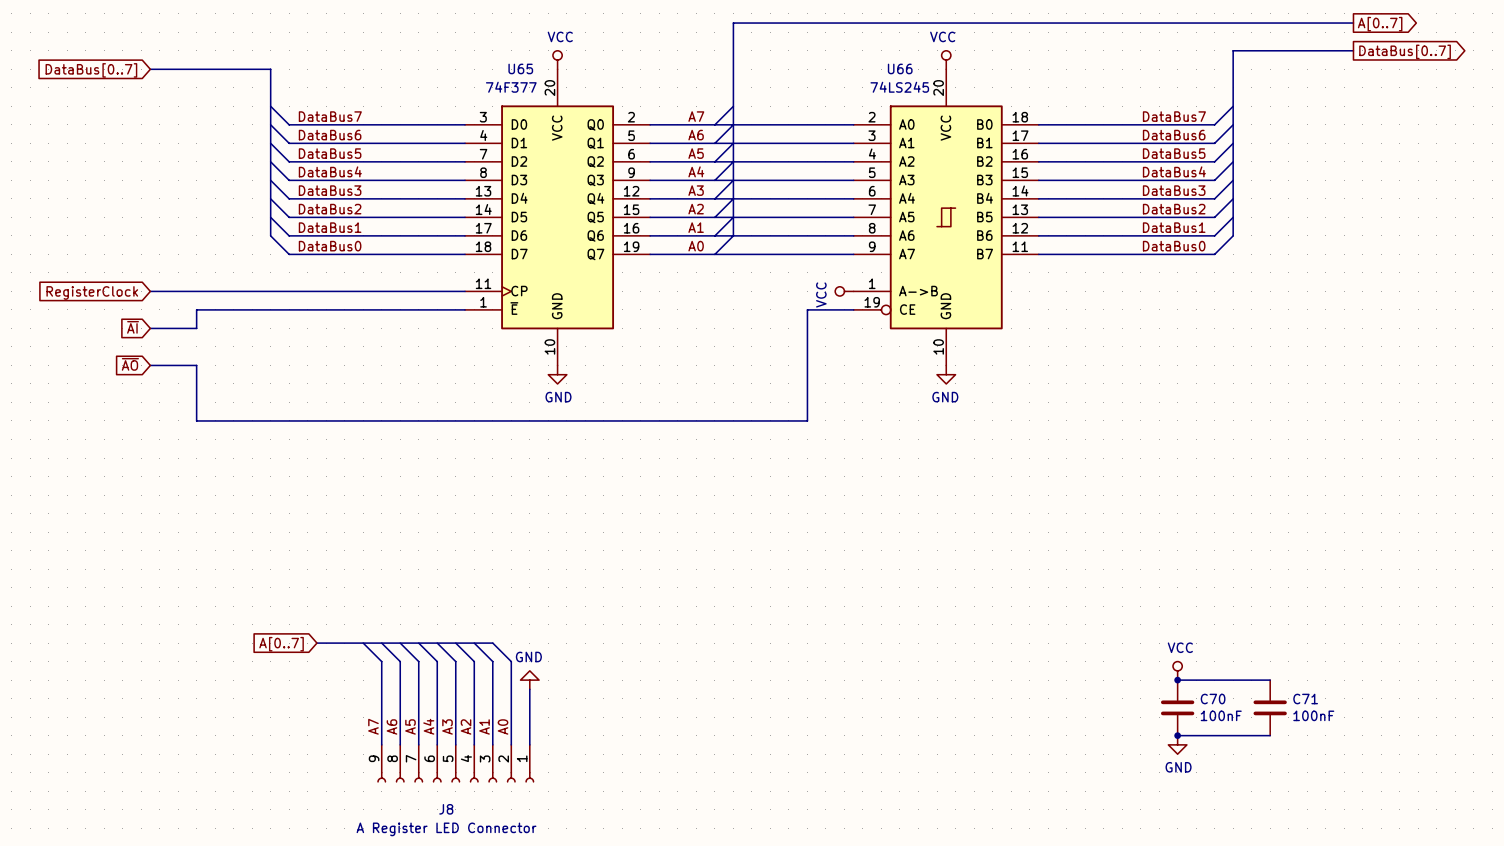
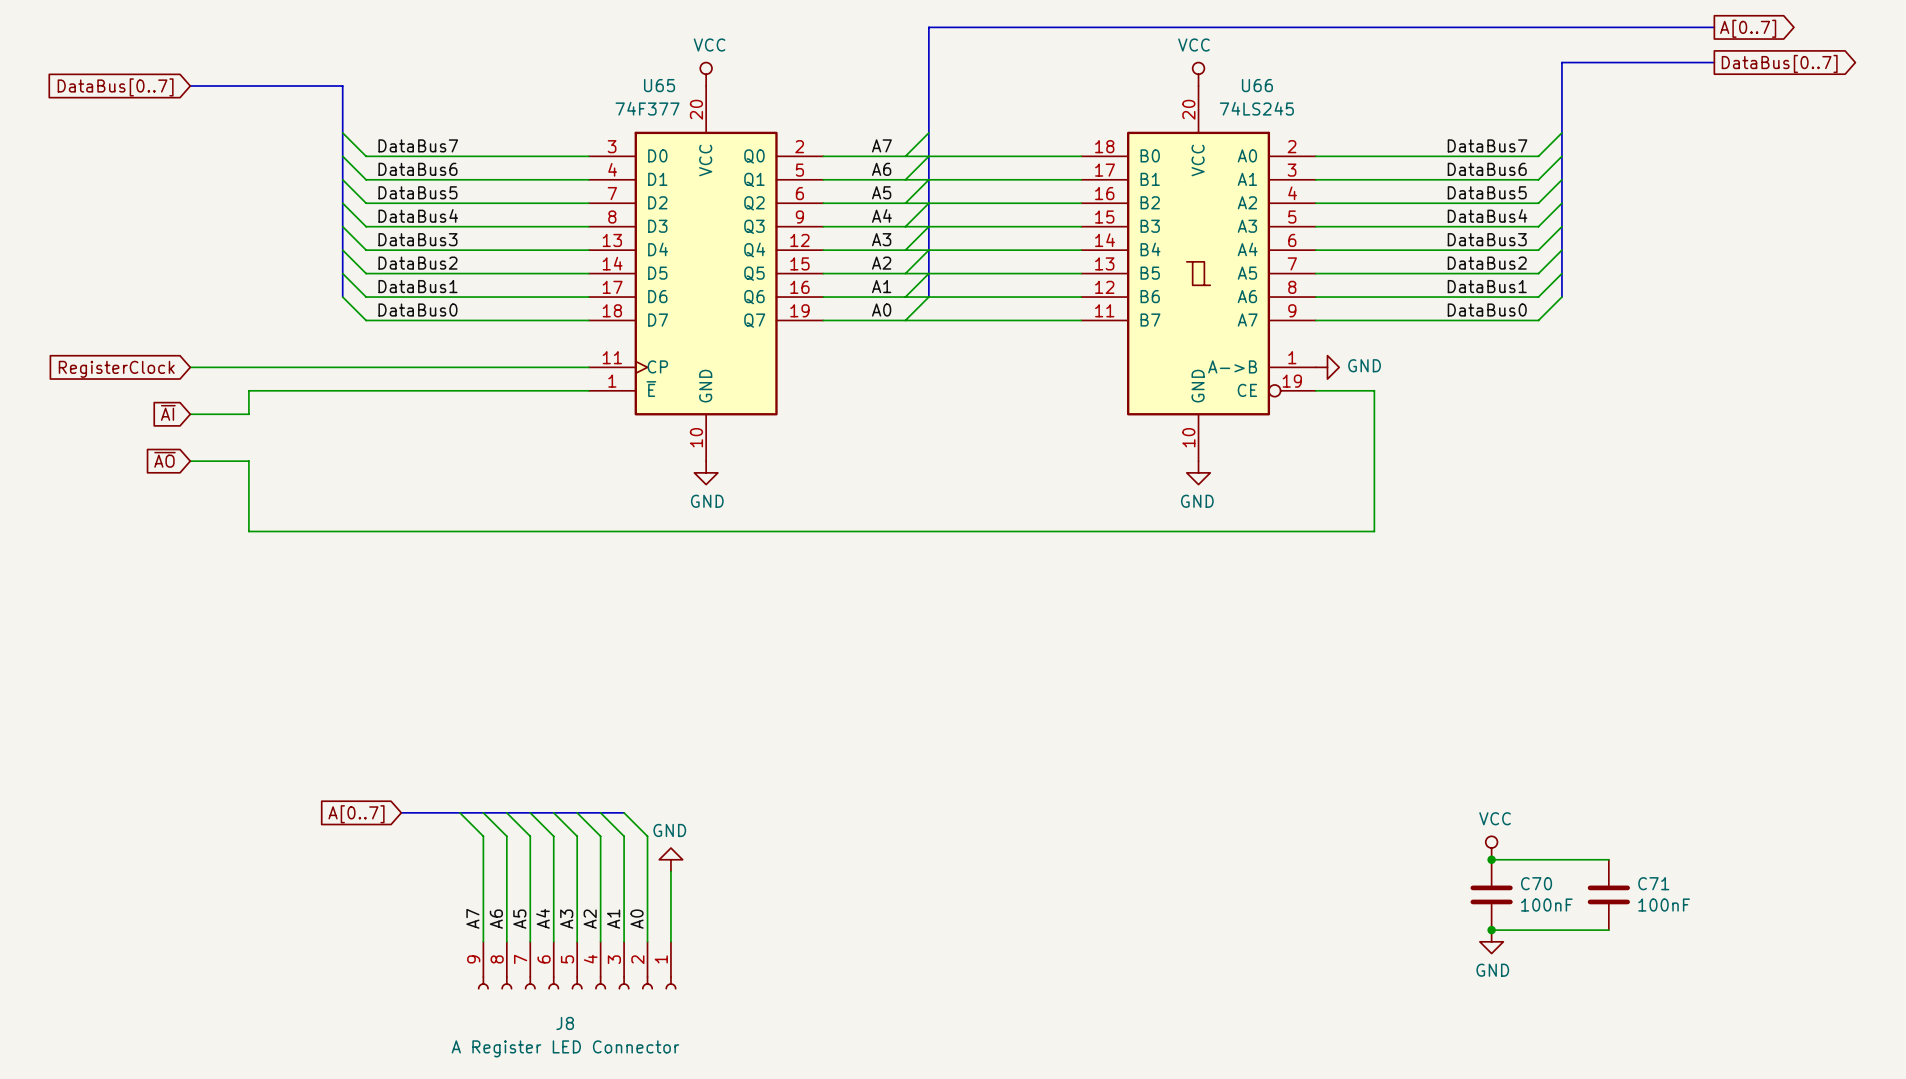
U66 flip: as is (946, 217) -> left-right (1198, 273)
power symbol: VCC (844, 291) -> none
power symbol: none -> GND (1327, 367)
wire: (853, 309) (807, 309) (807, 420) -> (1315, 390) (1374, 390) (1374, 531) (1022, 531)

